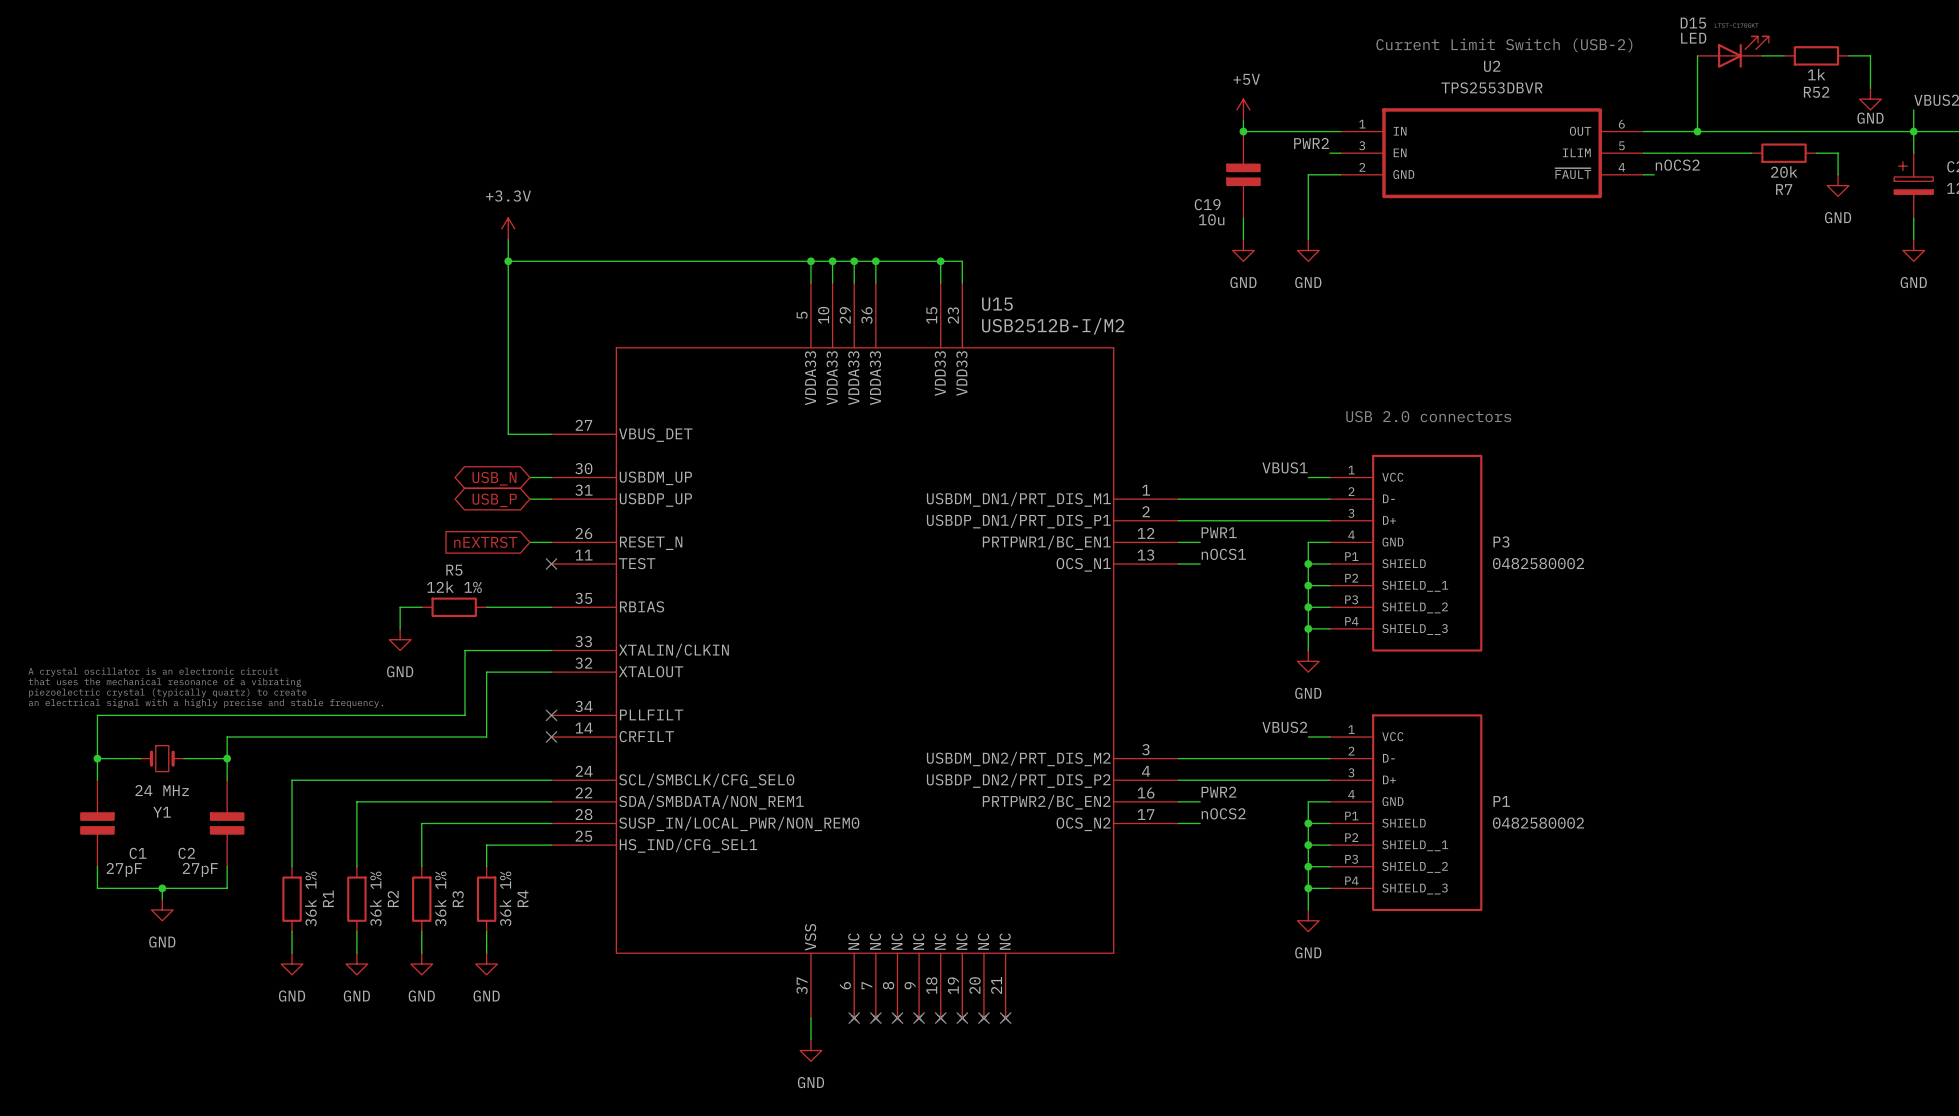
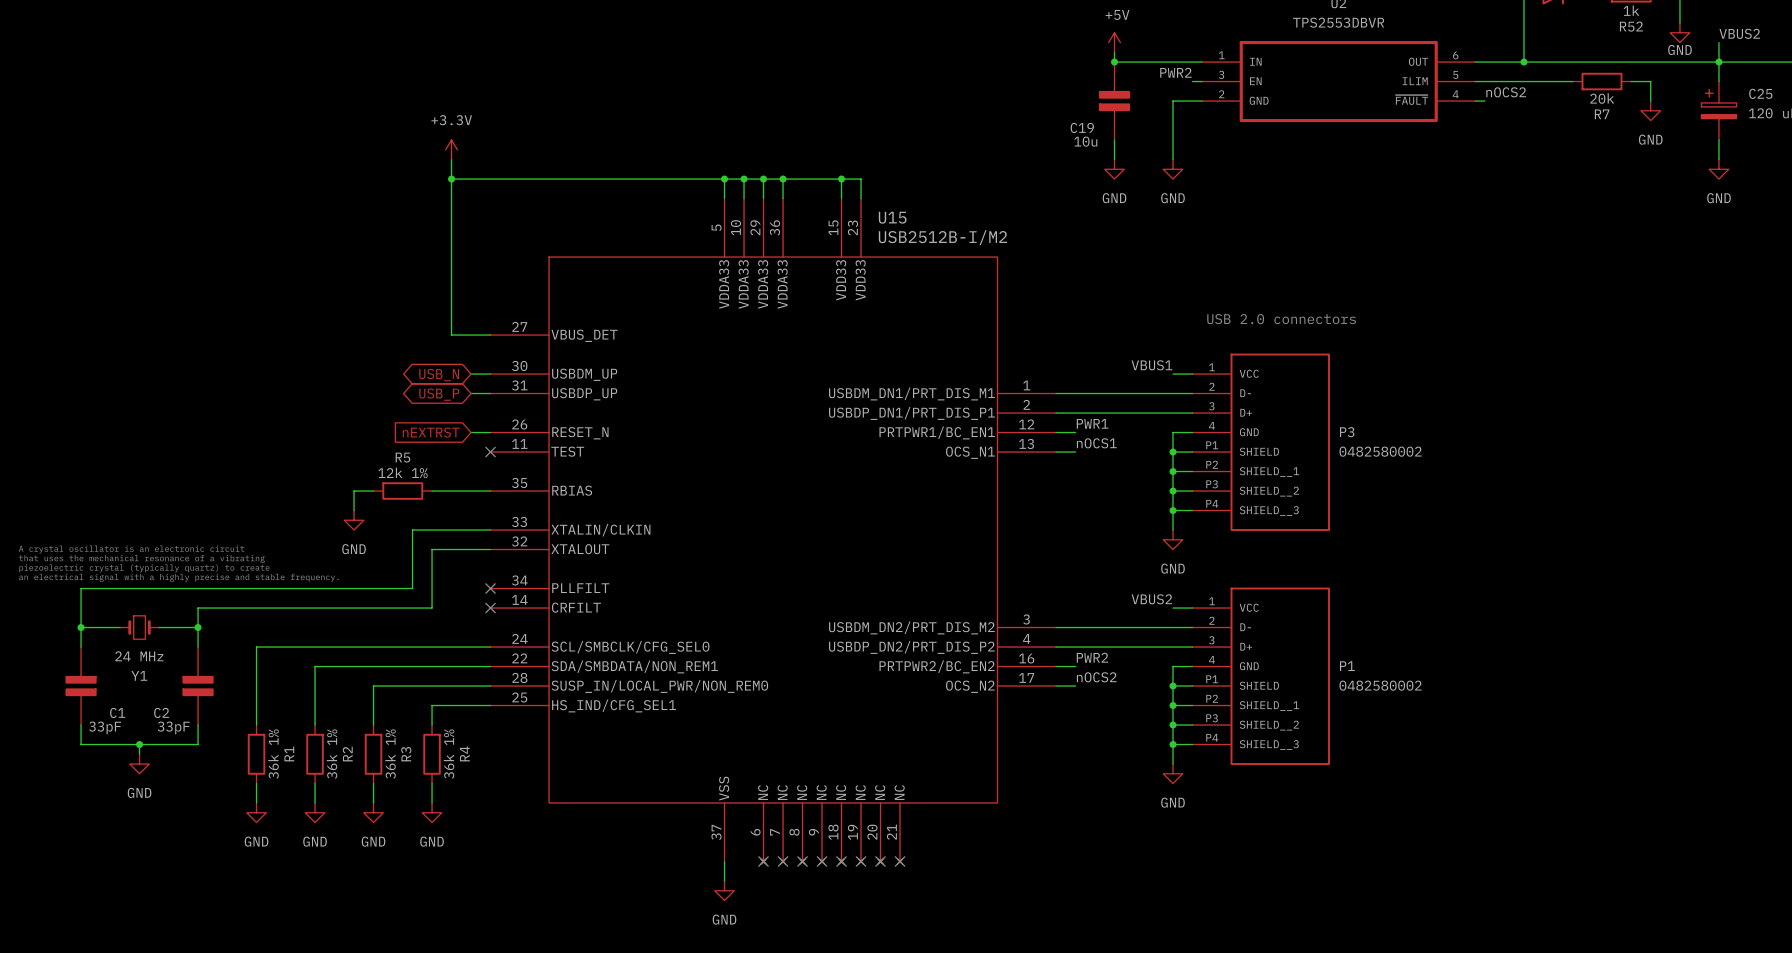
C1 value: 27pF (124, 869) -> 33pF (105, 727)
C2 value: 27pF (200, 869) -> 33pF (173, 727)

